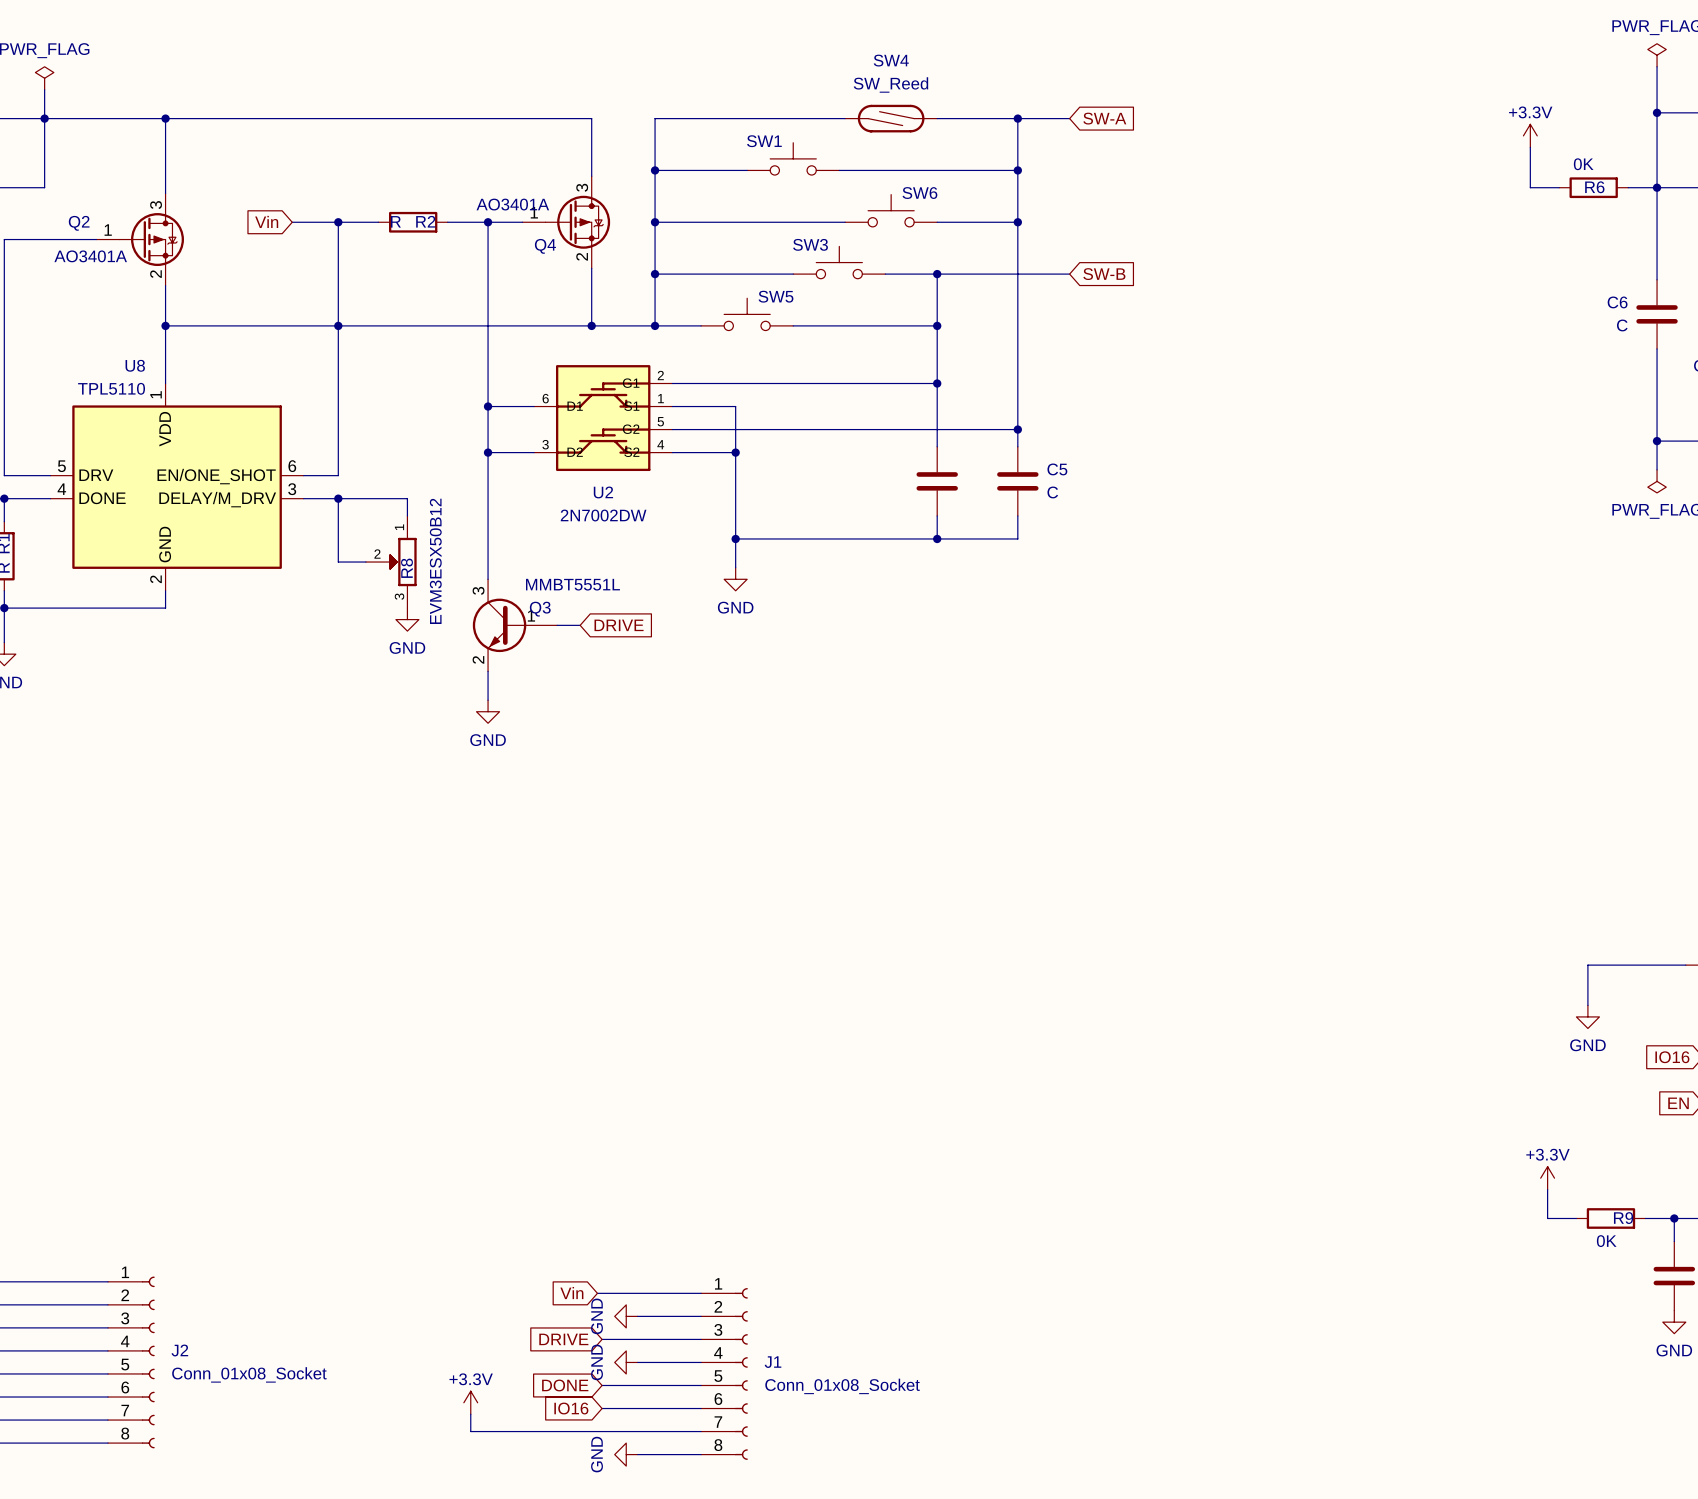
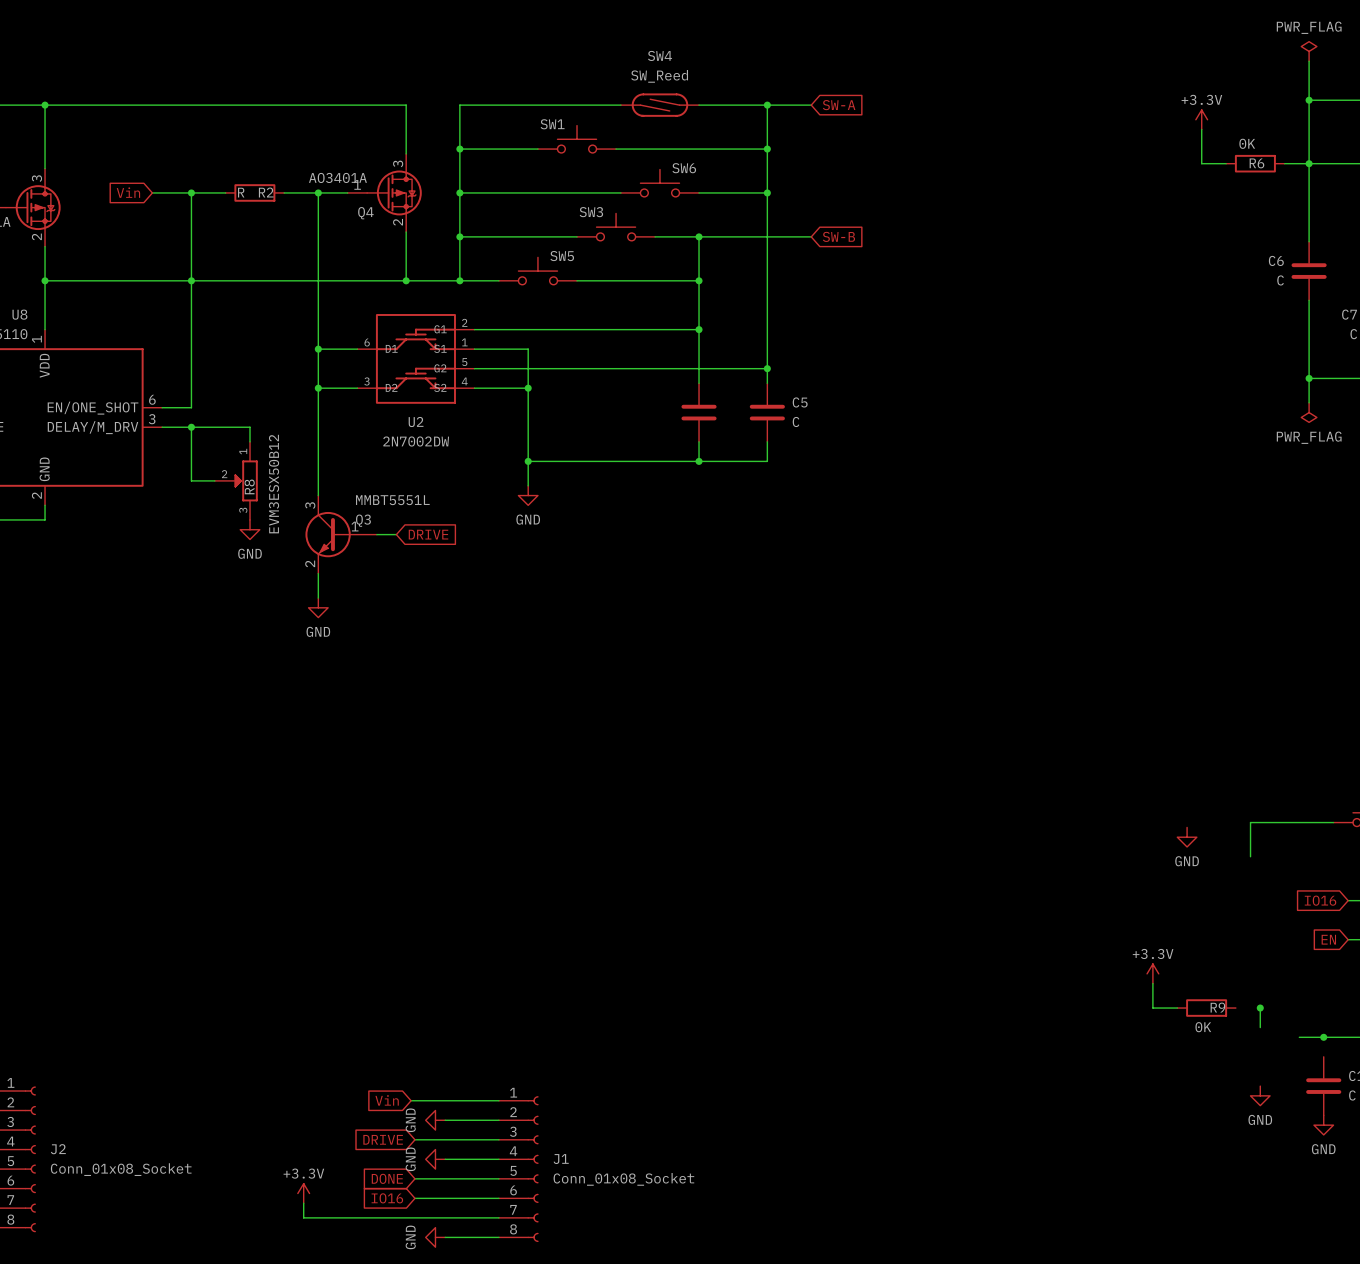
power symbol position: GND (1587, 1016) -> GND (1187, 837)
power symbol position: +3.3V (1547, 1178) -> +3.3V (1152, 973)
junction: none -> (1260, 1008)
wire: (1547, 1189) (1547, 1218) (1576, 1218) -> (1152, 983) (1152, 1008) (1177, 1008)
R9 position: (1610, 1218) -> (1206, 1008)
wire: (1674, 1218) (1674, 1241) -> (1260, 1008) (1260, 1027)
power symbol: none -> GND (1260, 1095)

